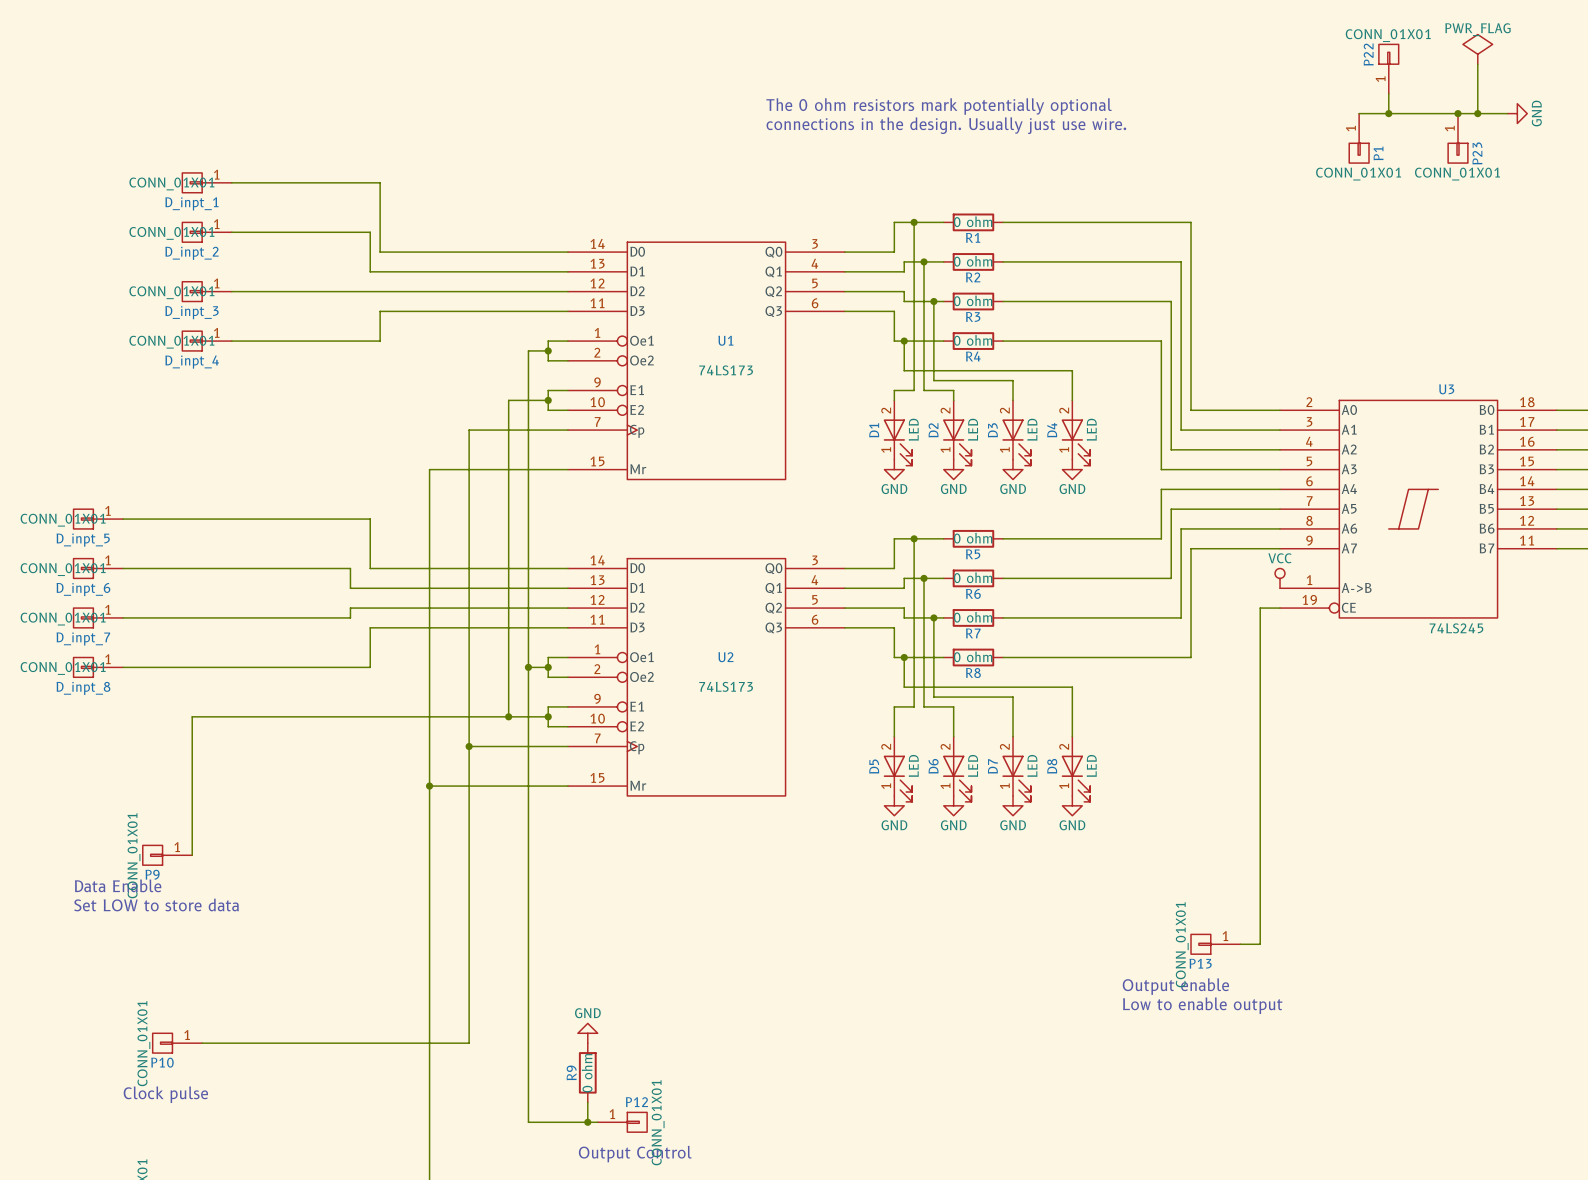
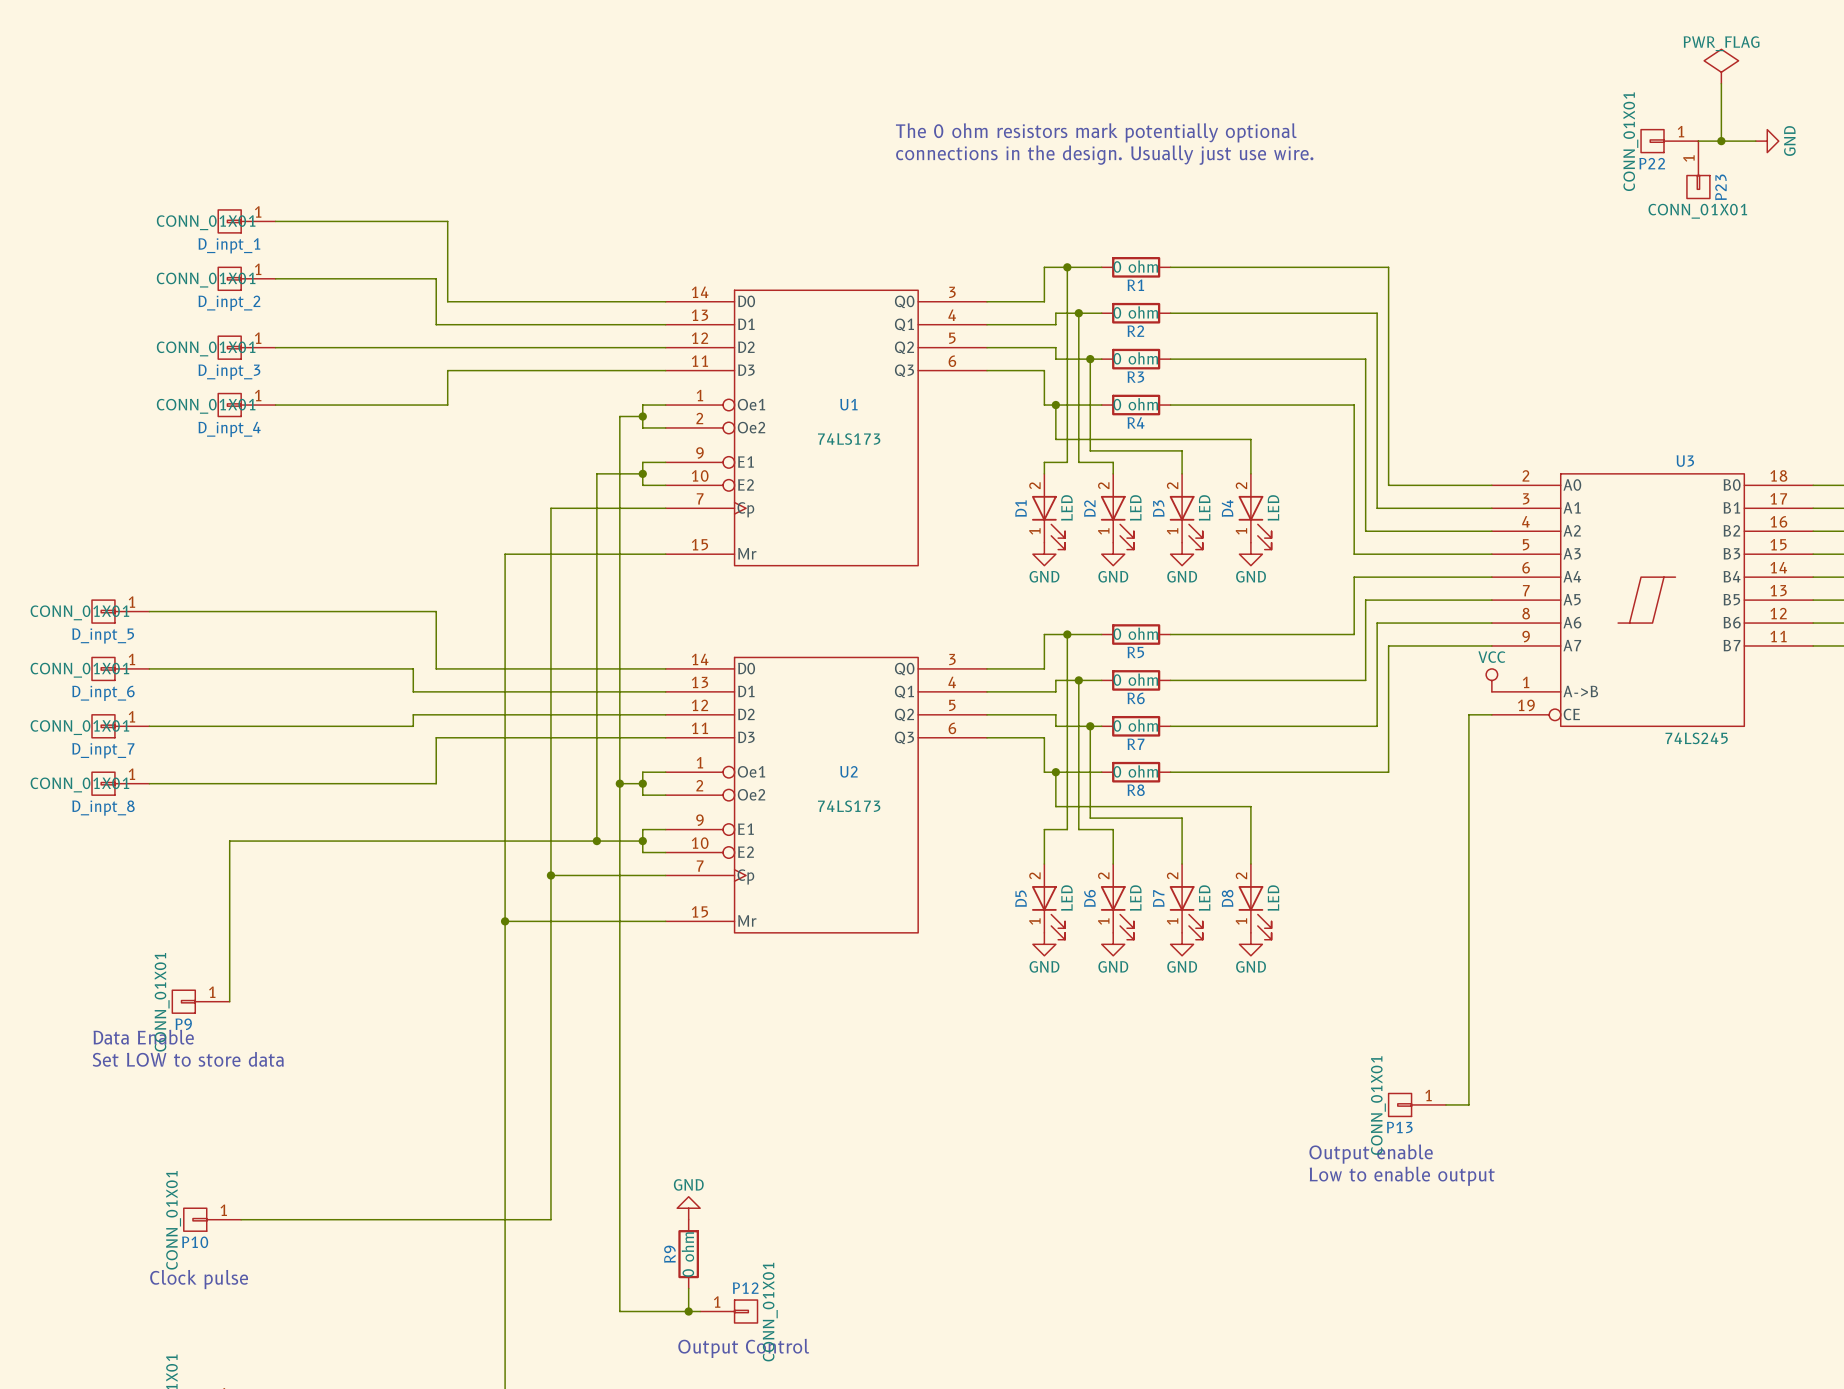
P22 rotation: 0° (1388, 54) -> 90° counterclockwise (1652, 141)
P22 position: (1388, 69) -> (1669, 141)
wire: (1388, 93) (1388, 113) -> none
wire: (1359, 113) (1458, 113) -> none
junction: (1388, 113) -> none
junction: (1458, 113) -> none
P1: CONN_01X01 (1359, 138) -> none

